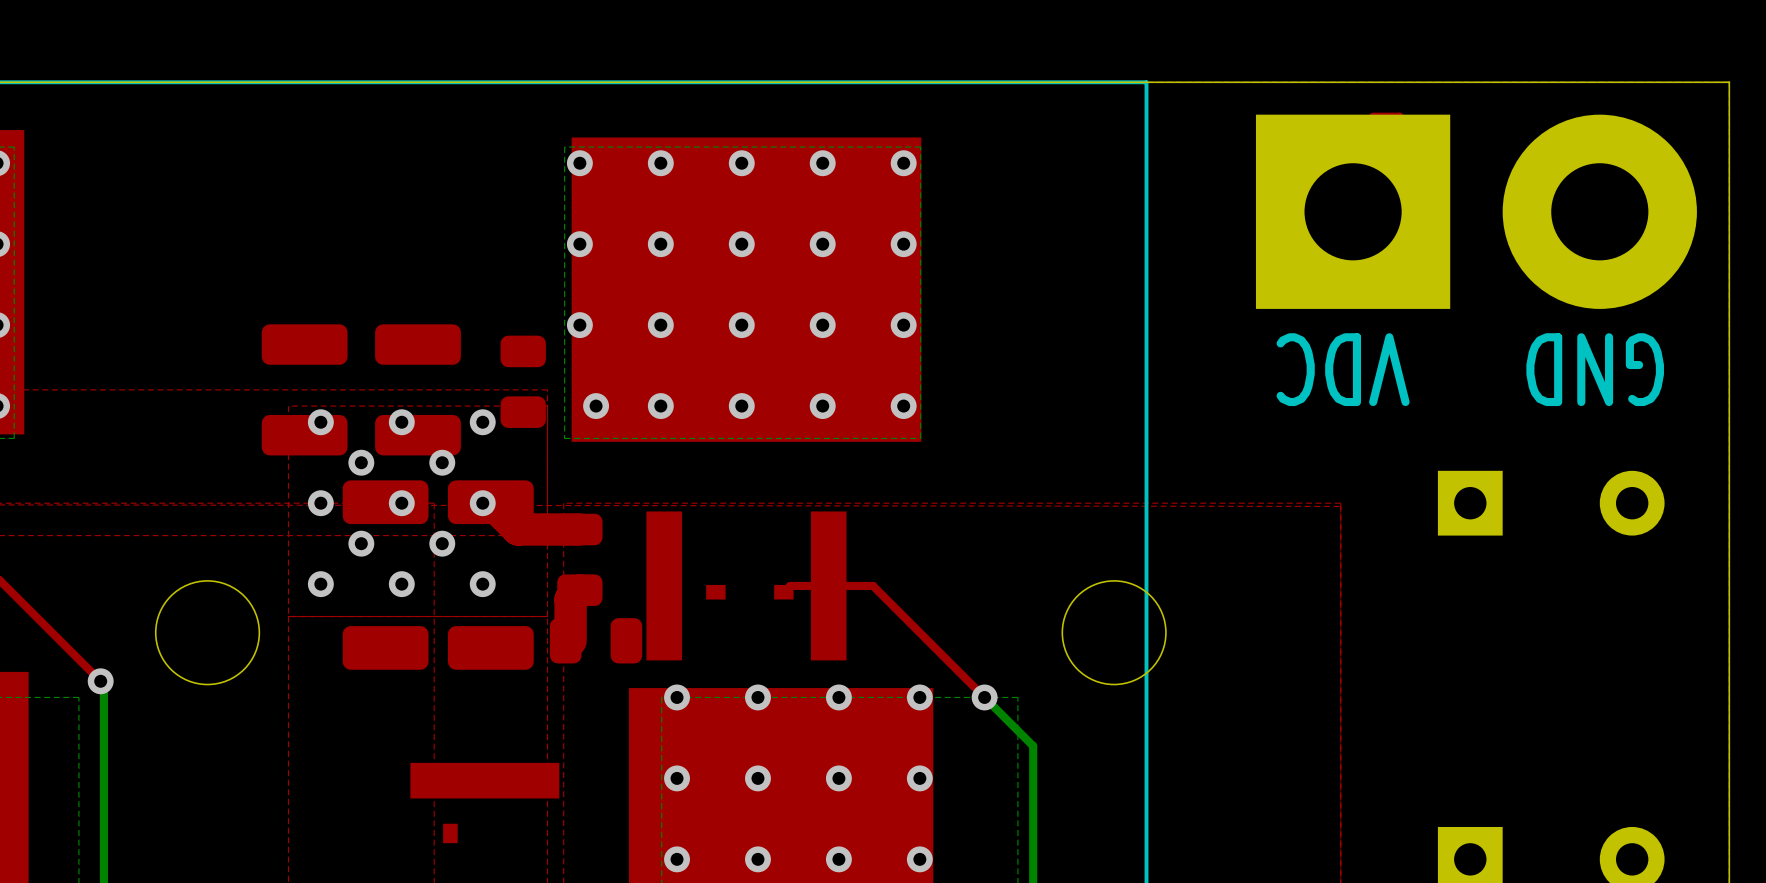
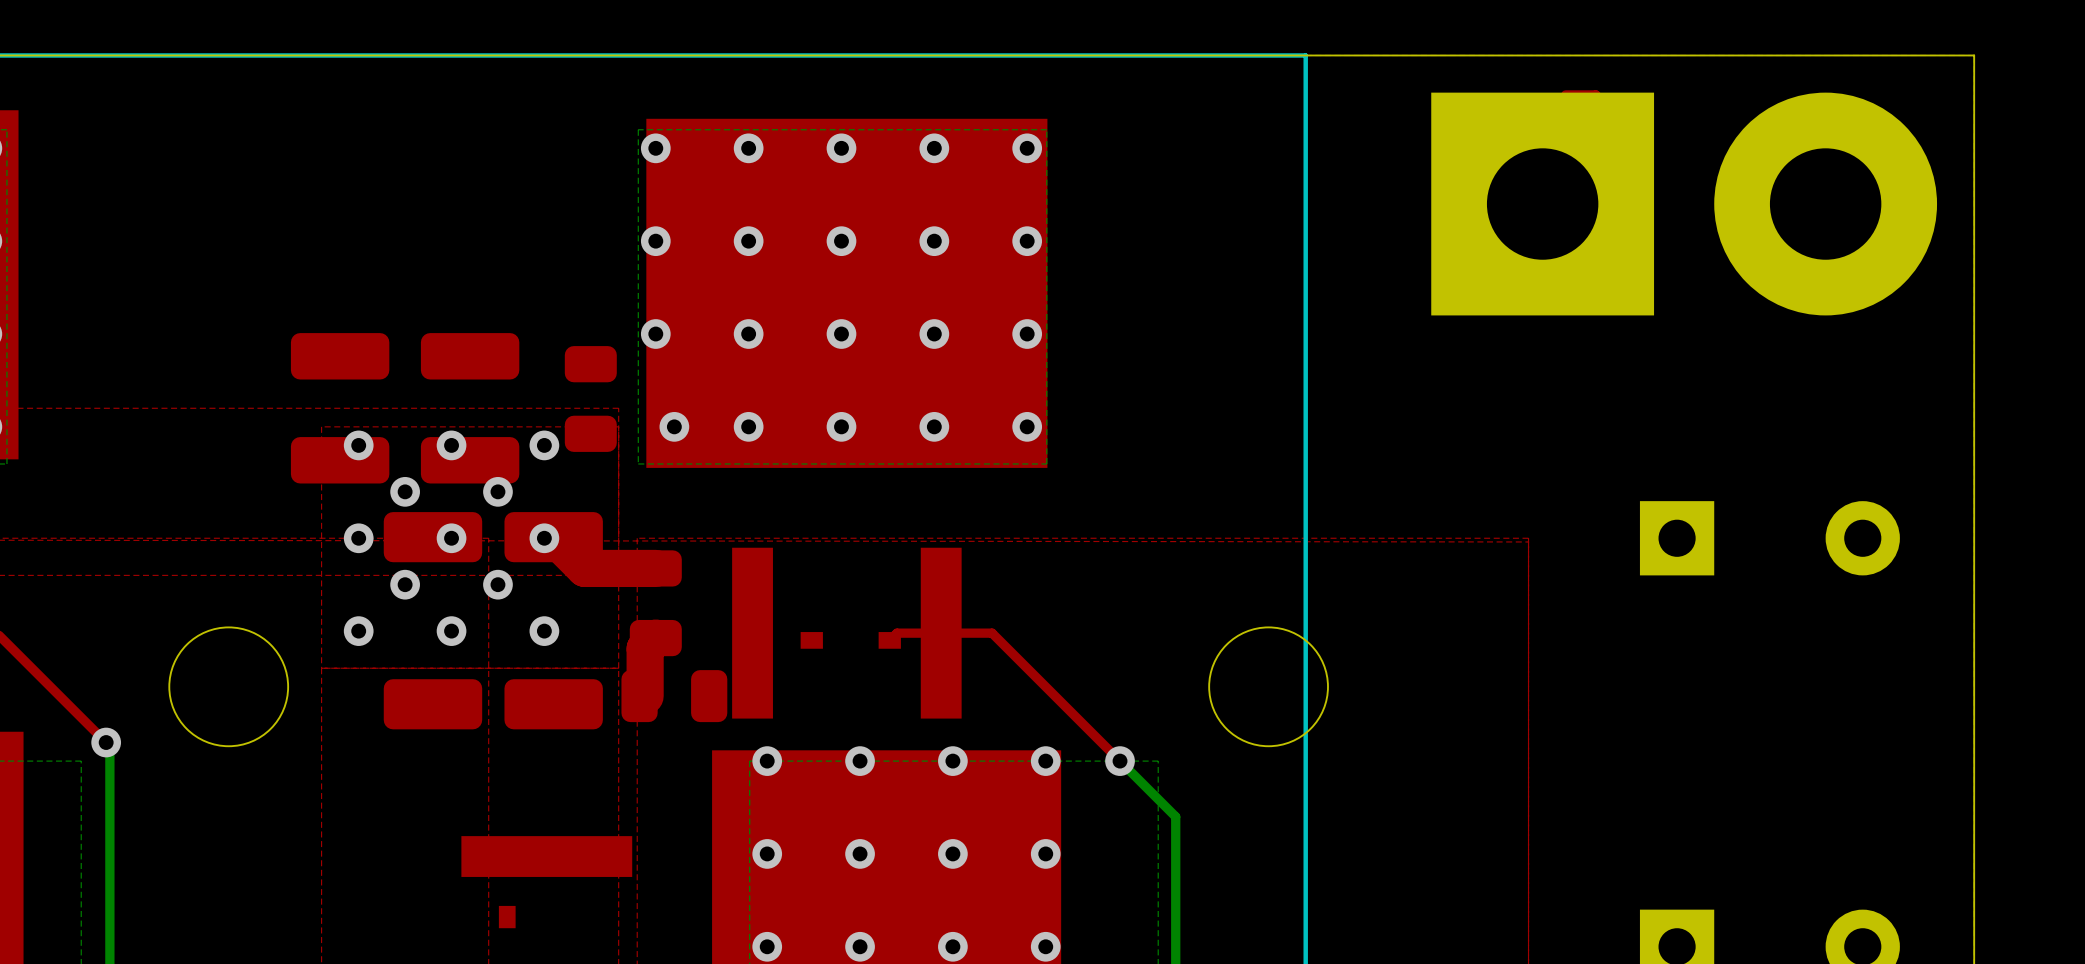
text: GND VDC (1470, 369) -> none

